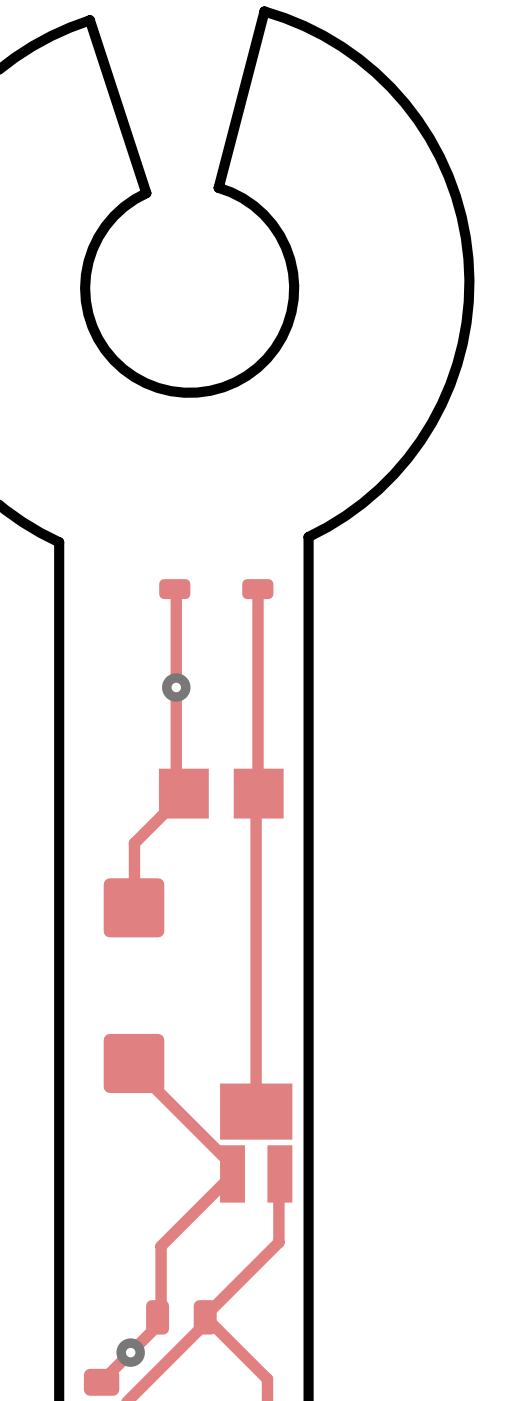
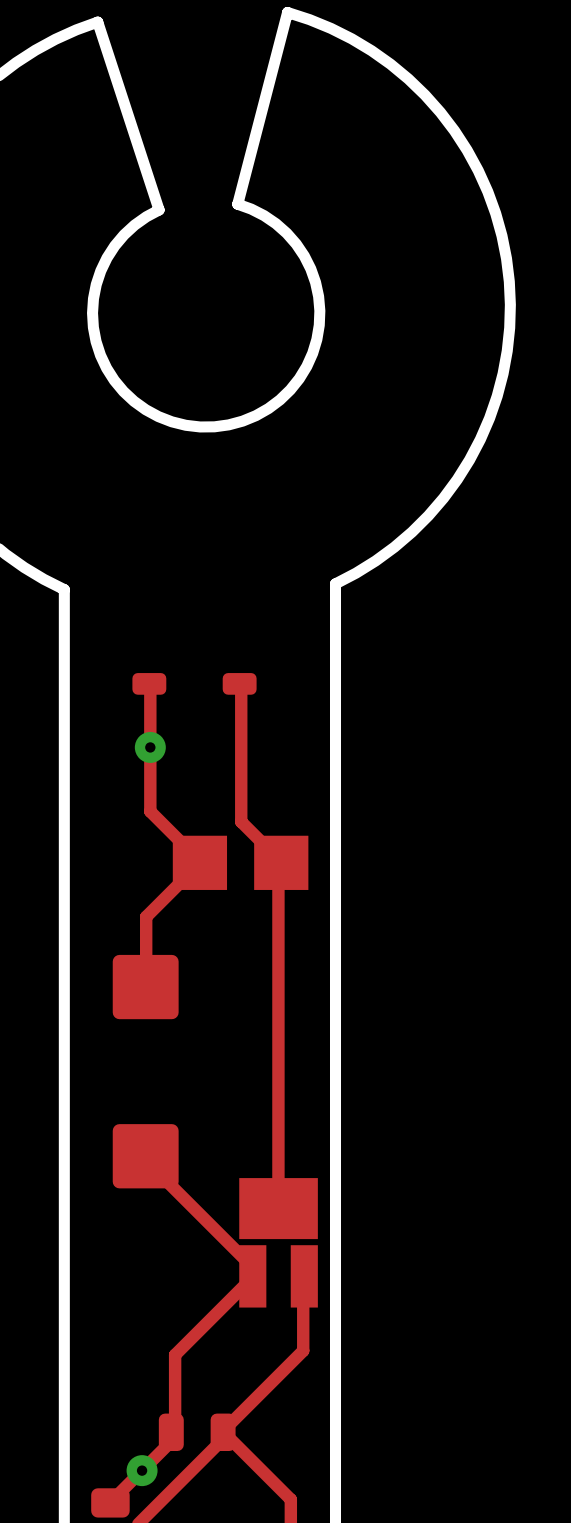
top track: (174, 589) (176, 784) -> (149, 683) (150, 811) (191, 852)
part position: (216, 589) -> (194, 683)
top track: (257, 589) (257, 791) -> (239, 683) (241, 685) (241, 821) (280, 861)
via position: (176, 687) -> (150, 747)

